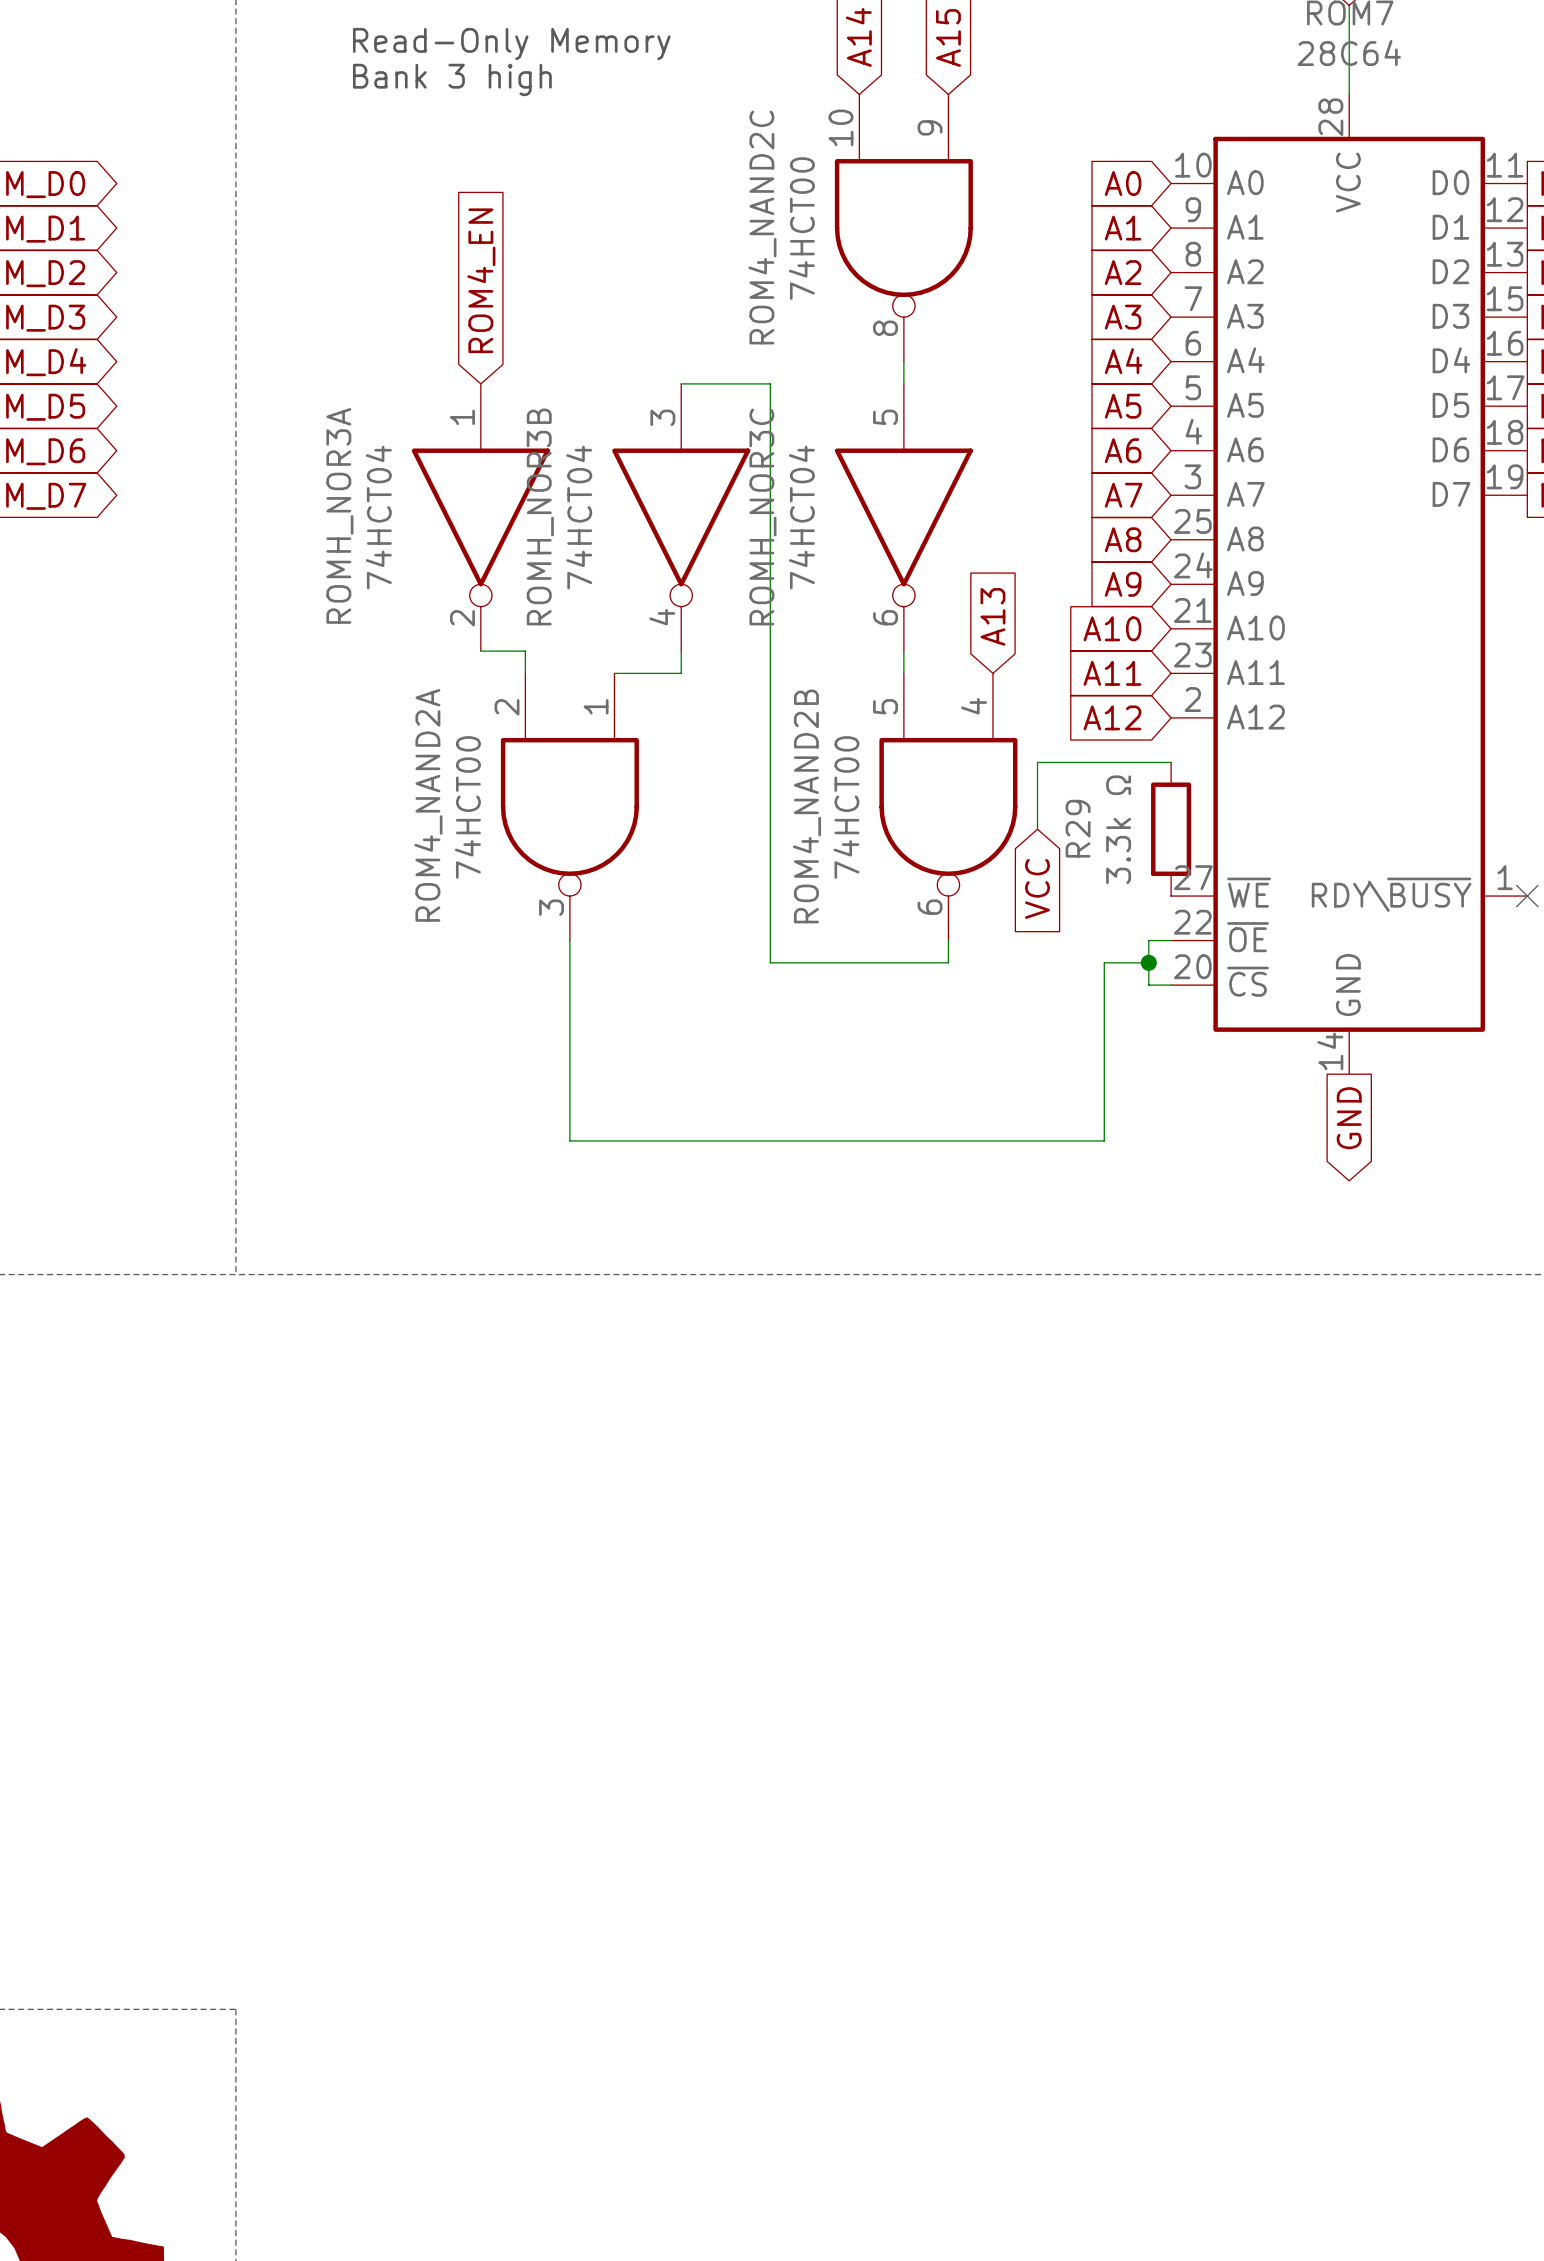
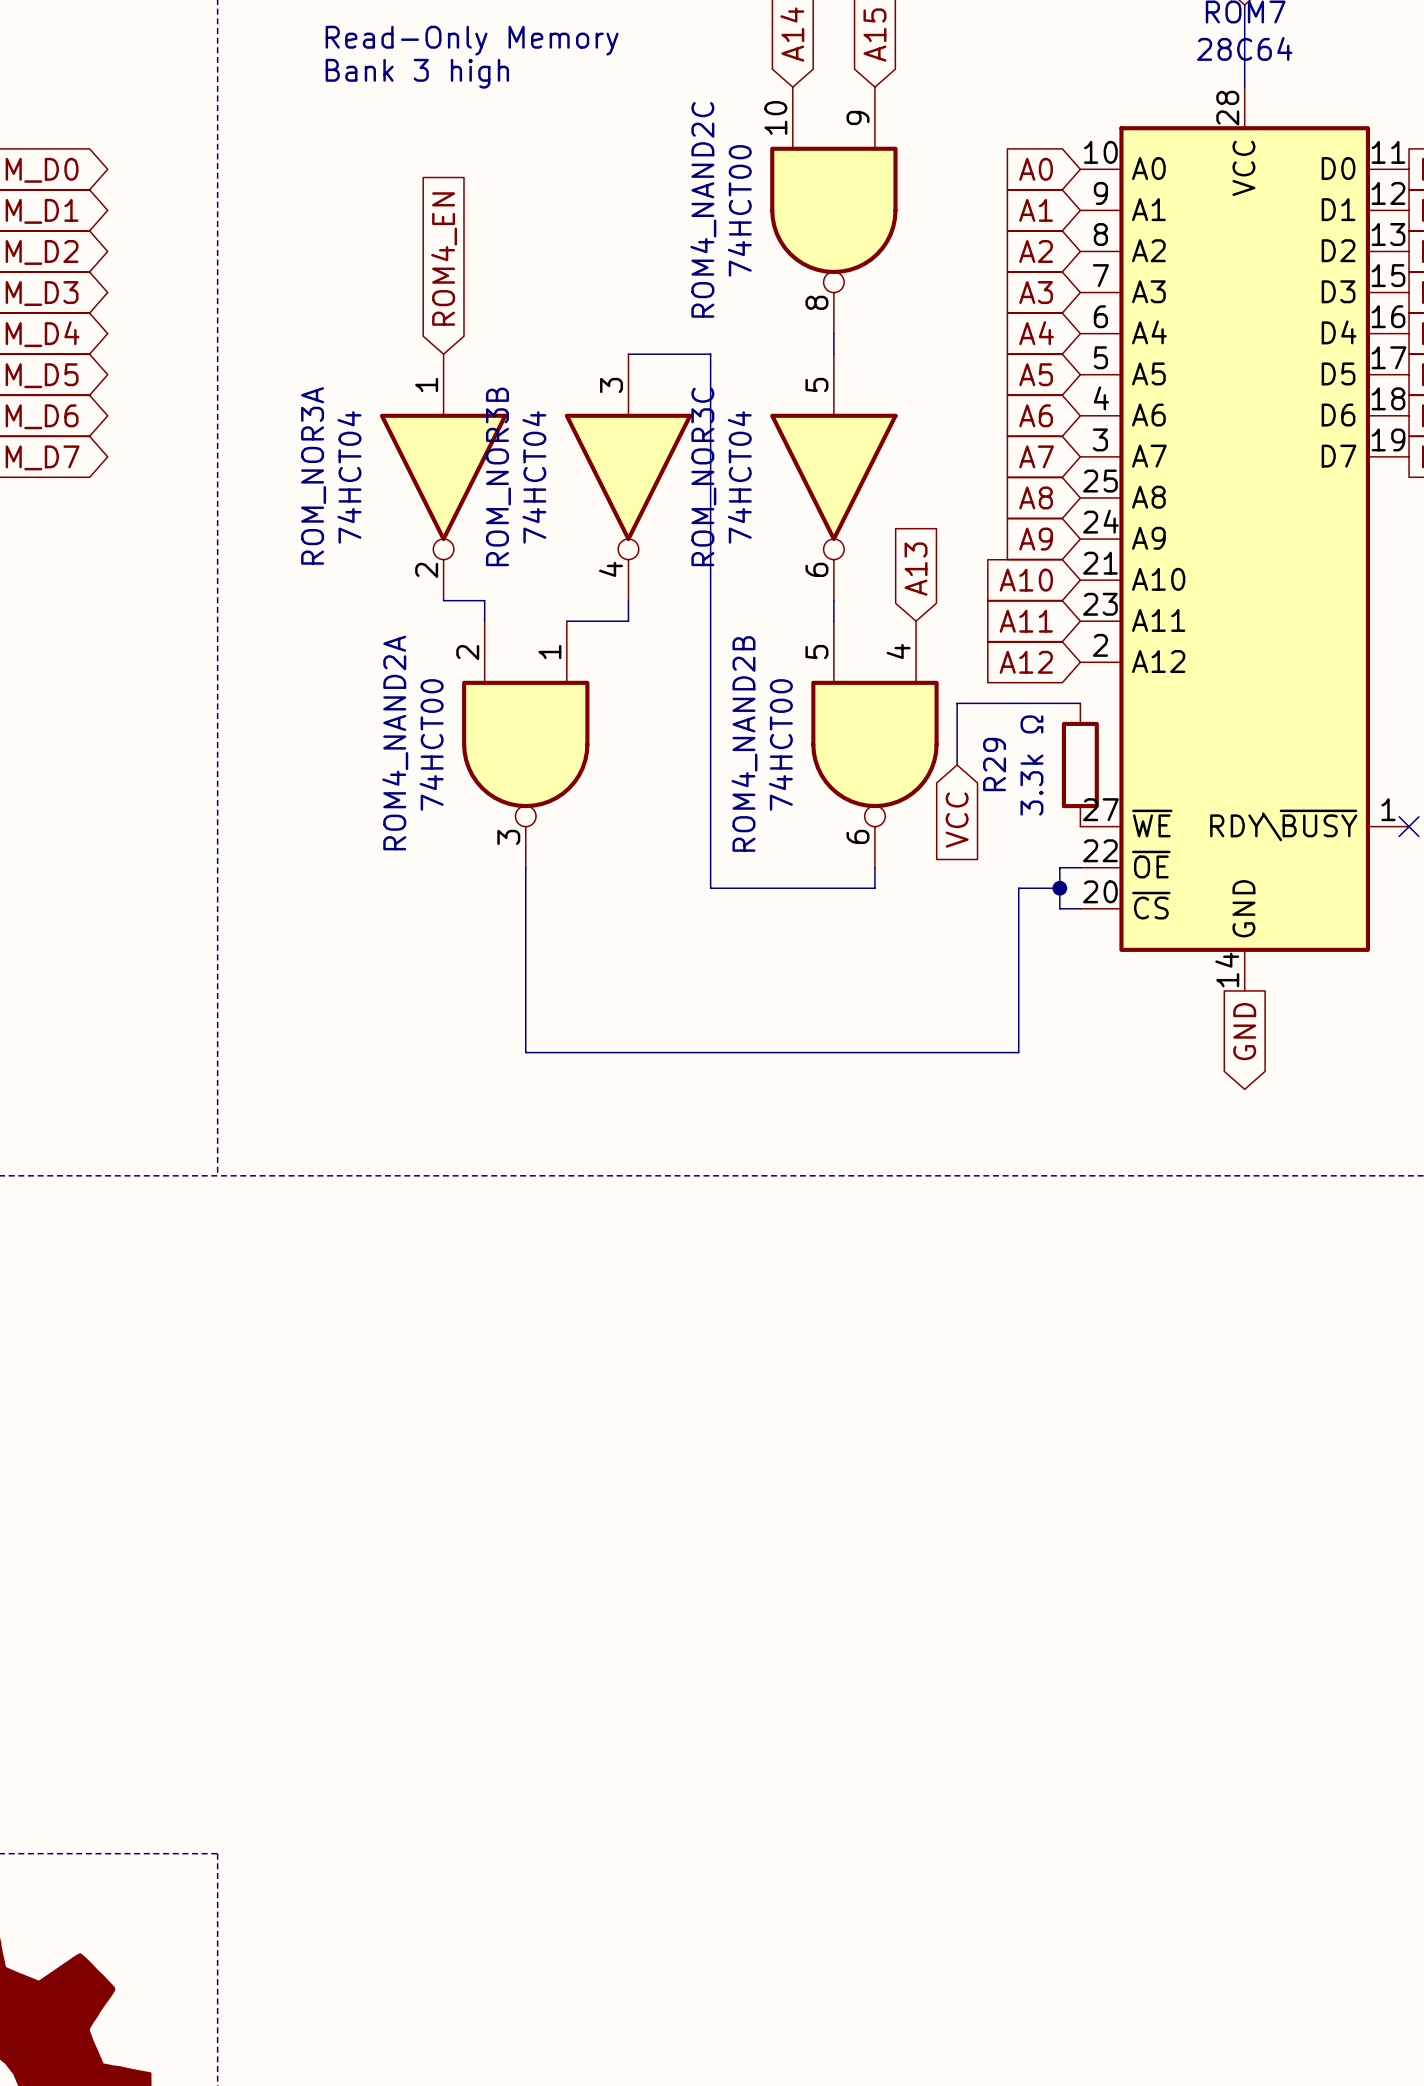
ROMH_NOR3A name: ROMH_NOR3A (339, 515) -> ROM_NOR3A (313, 475)
ROMH_NOR3B name: ROMH_NOR3B (540, 516) -> ROM_NOR3B (498, 476)
ROMH_NOR3C name: ROMH_NOR3C (762, 516) -> ROM_NOR3C (703, 476)

